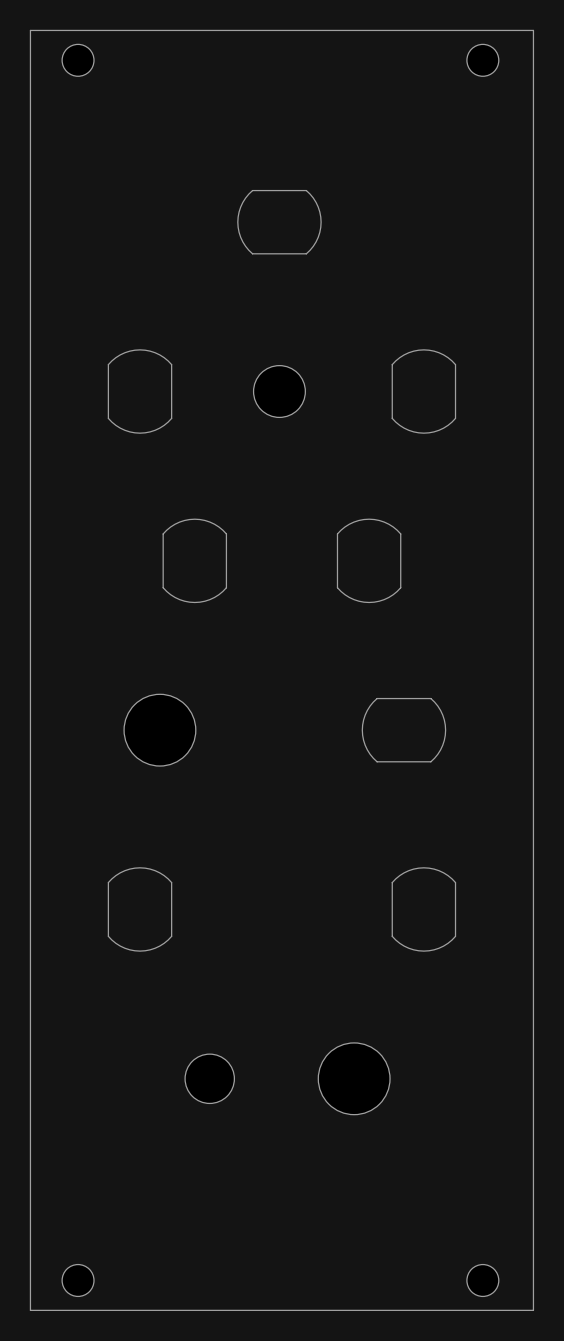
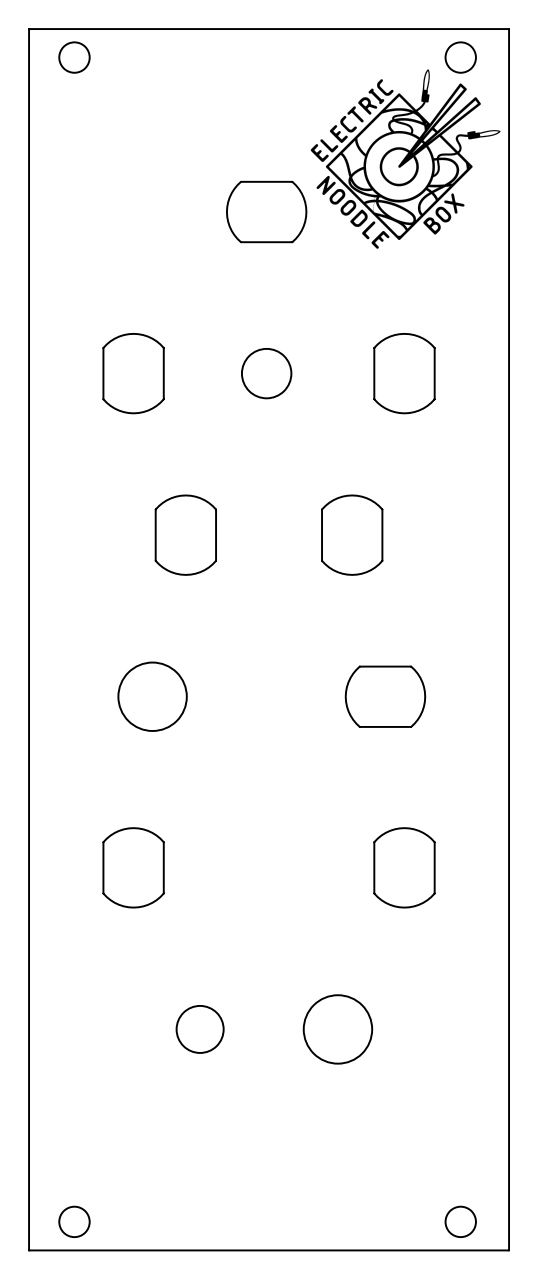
drawing: none -> [310, 69, 501, 249]

